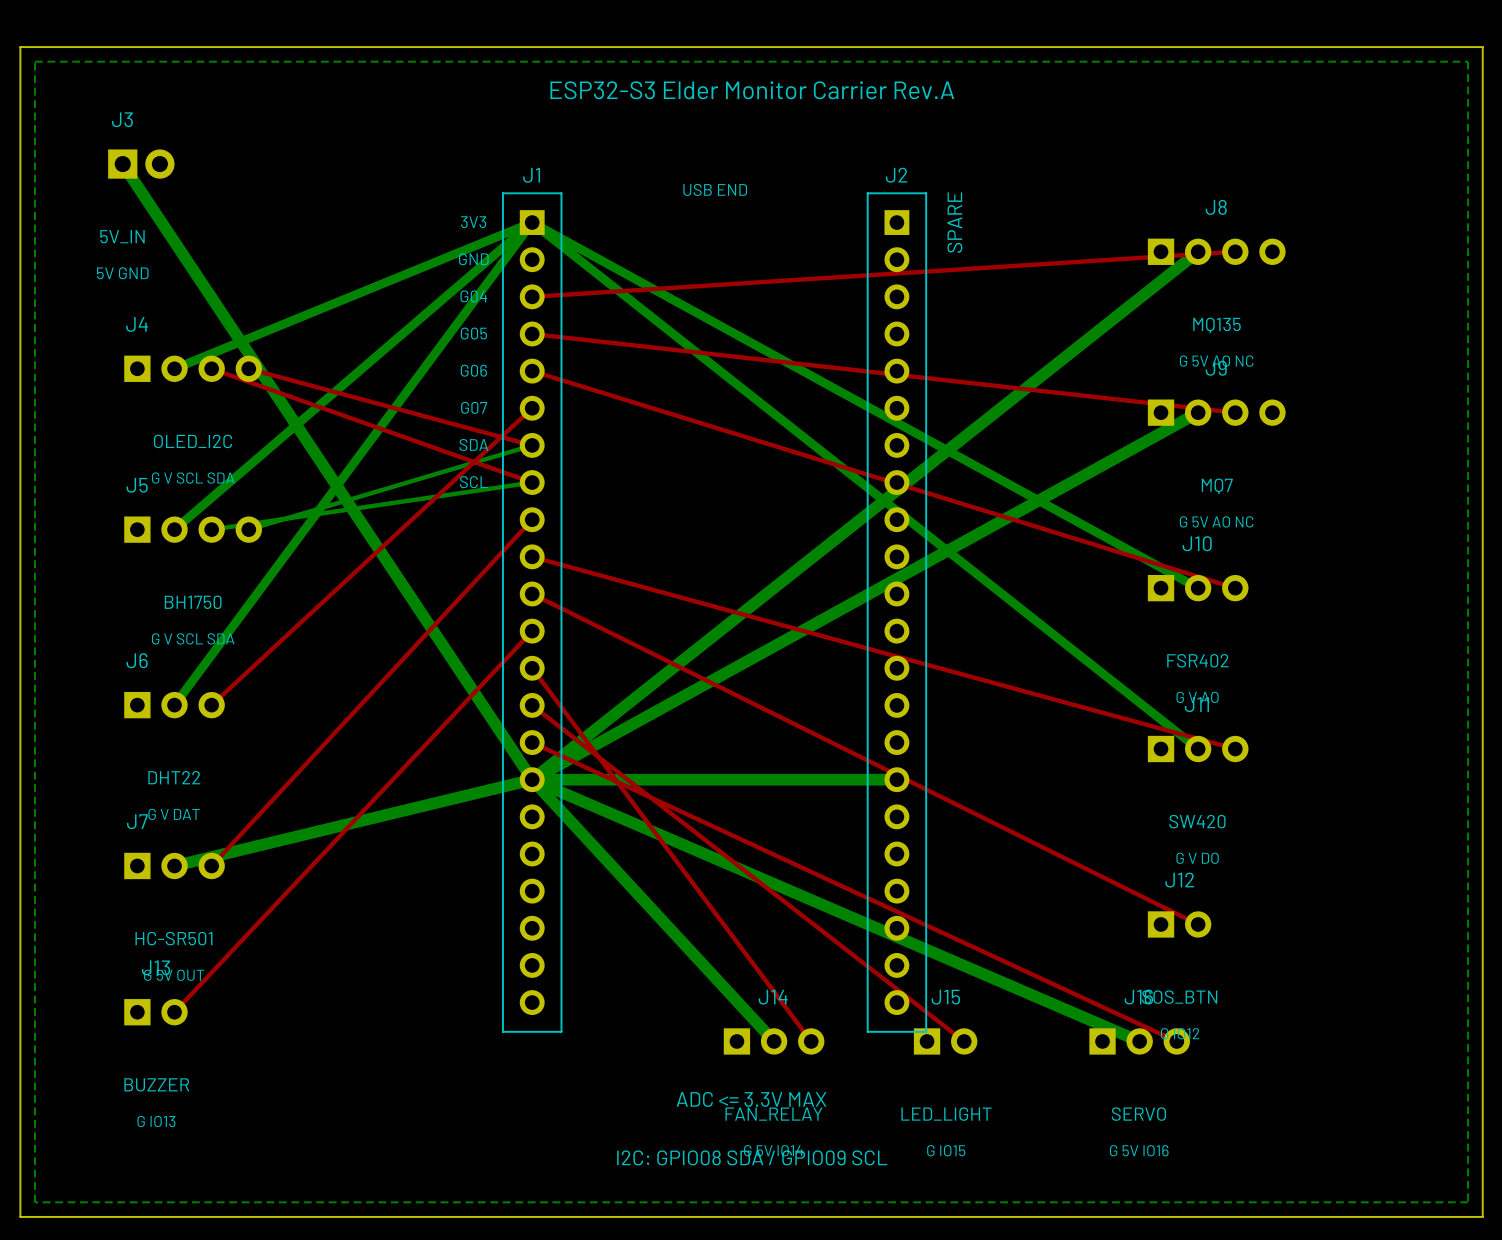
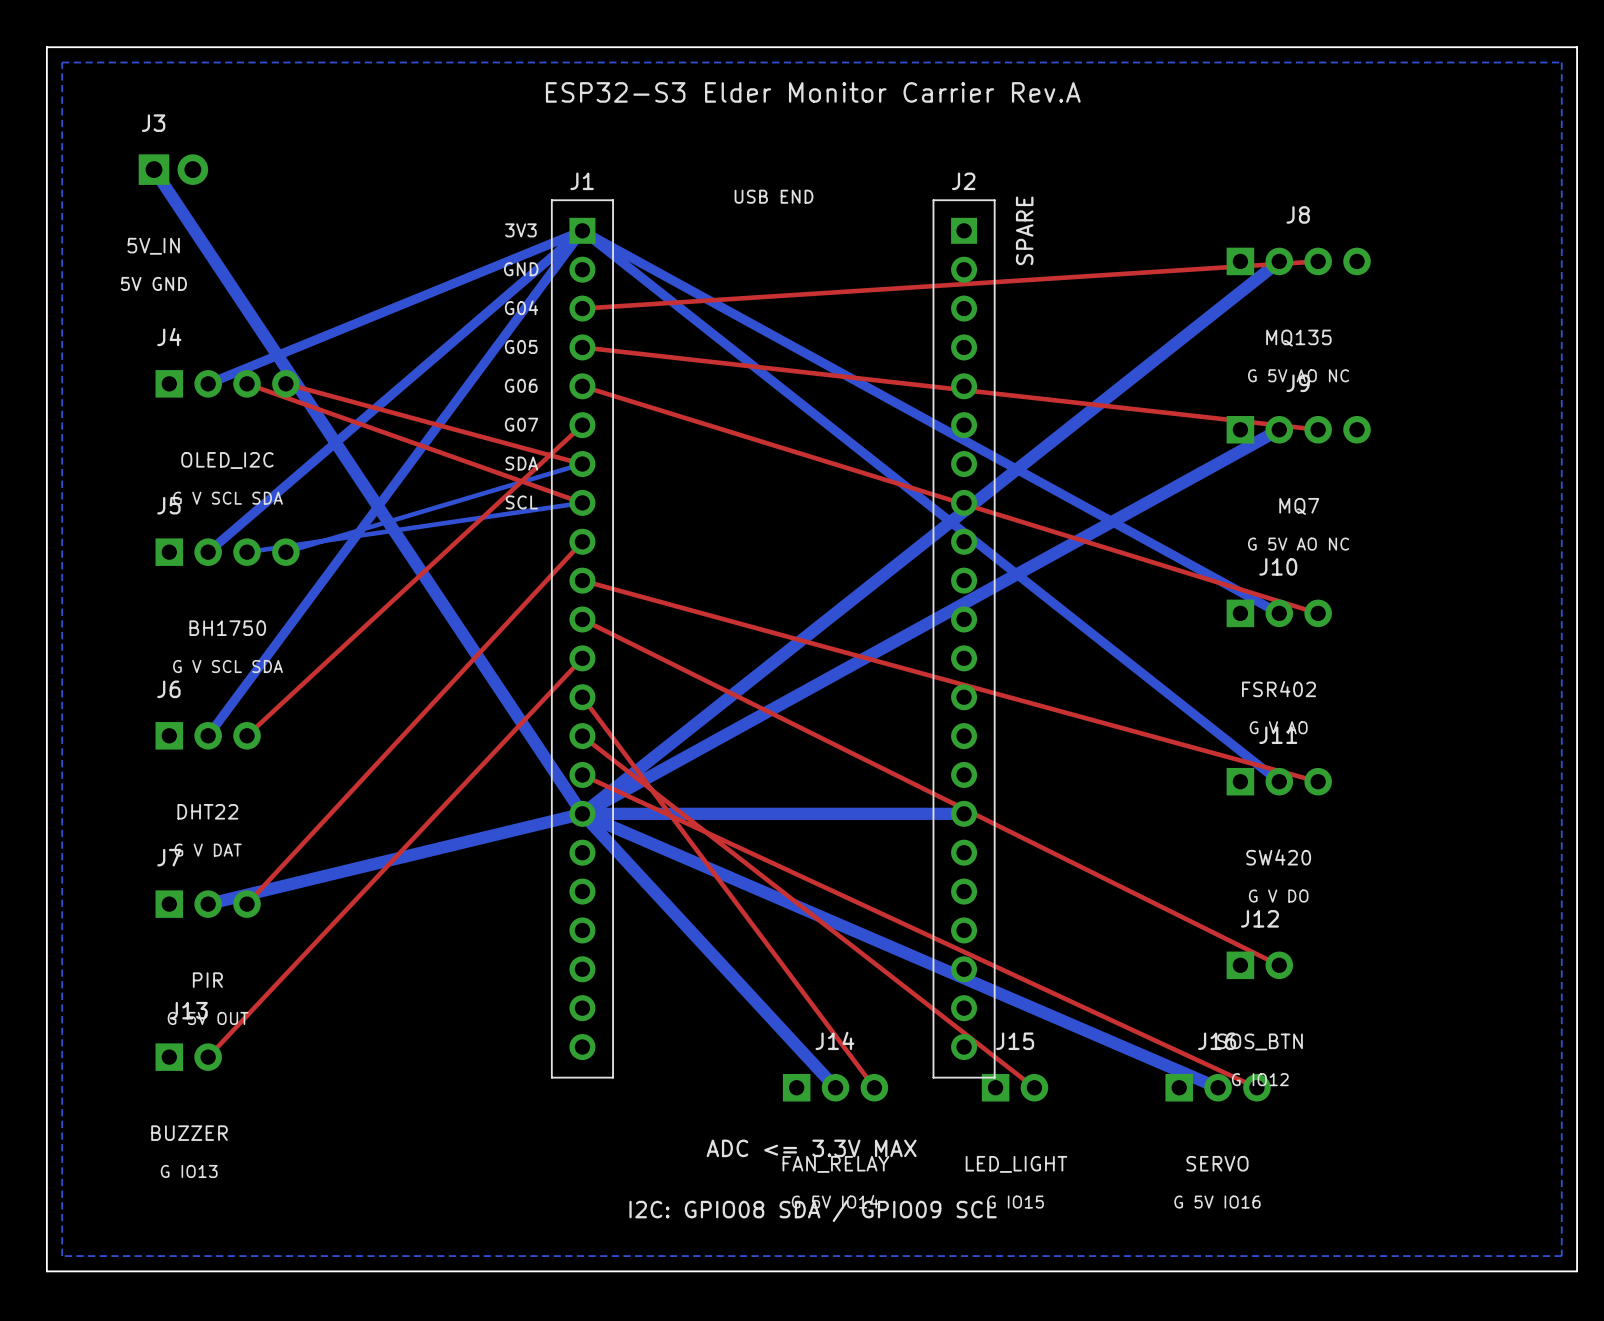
J7 value: HC-SR501 (173, 938) -> PIR (207, 980)

